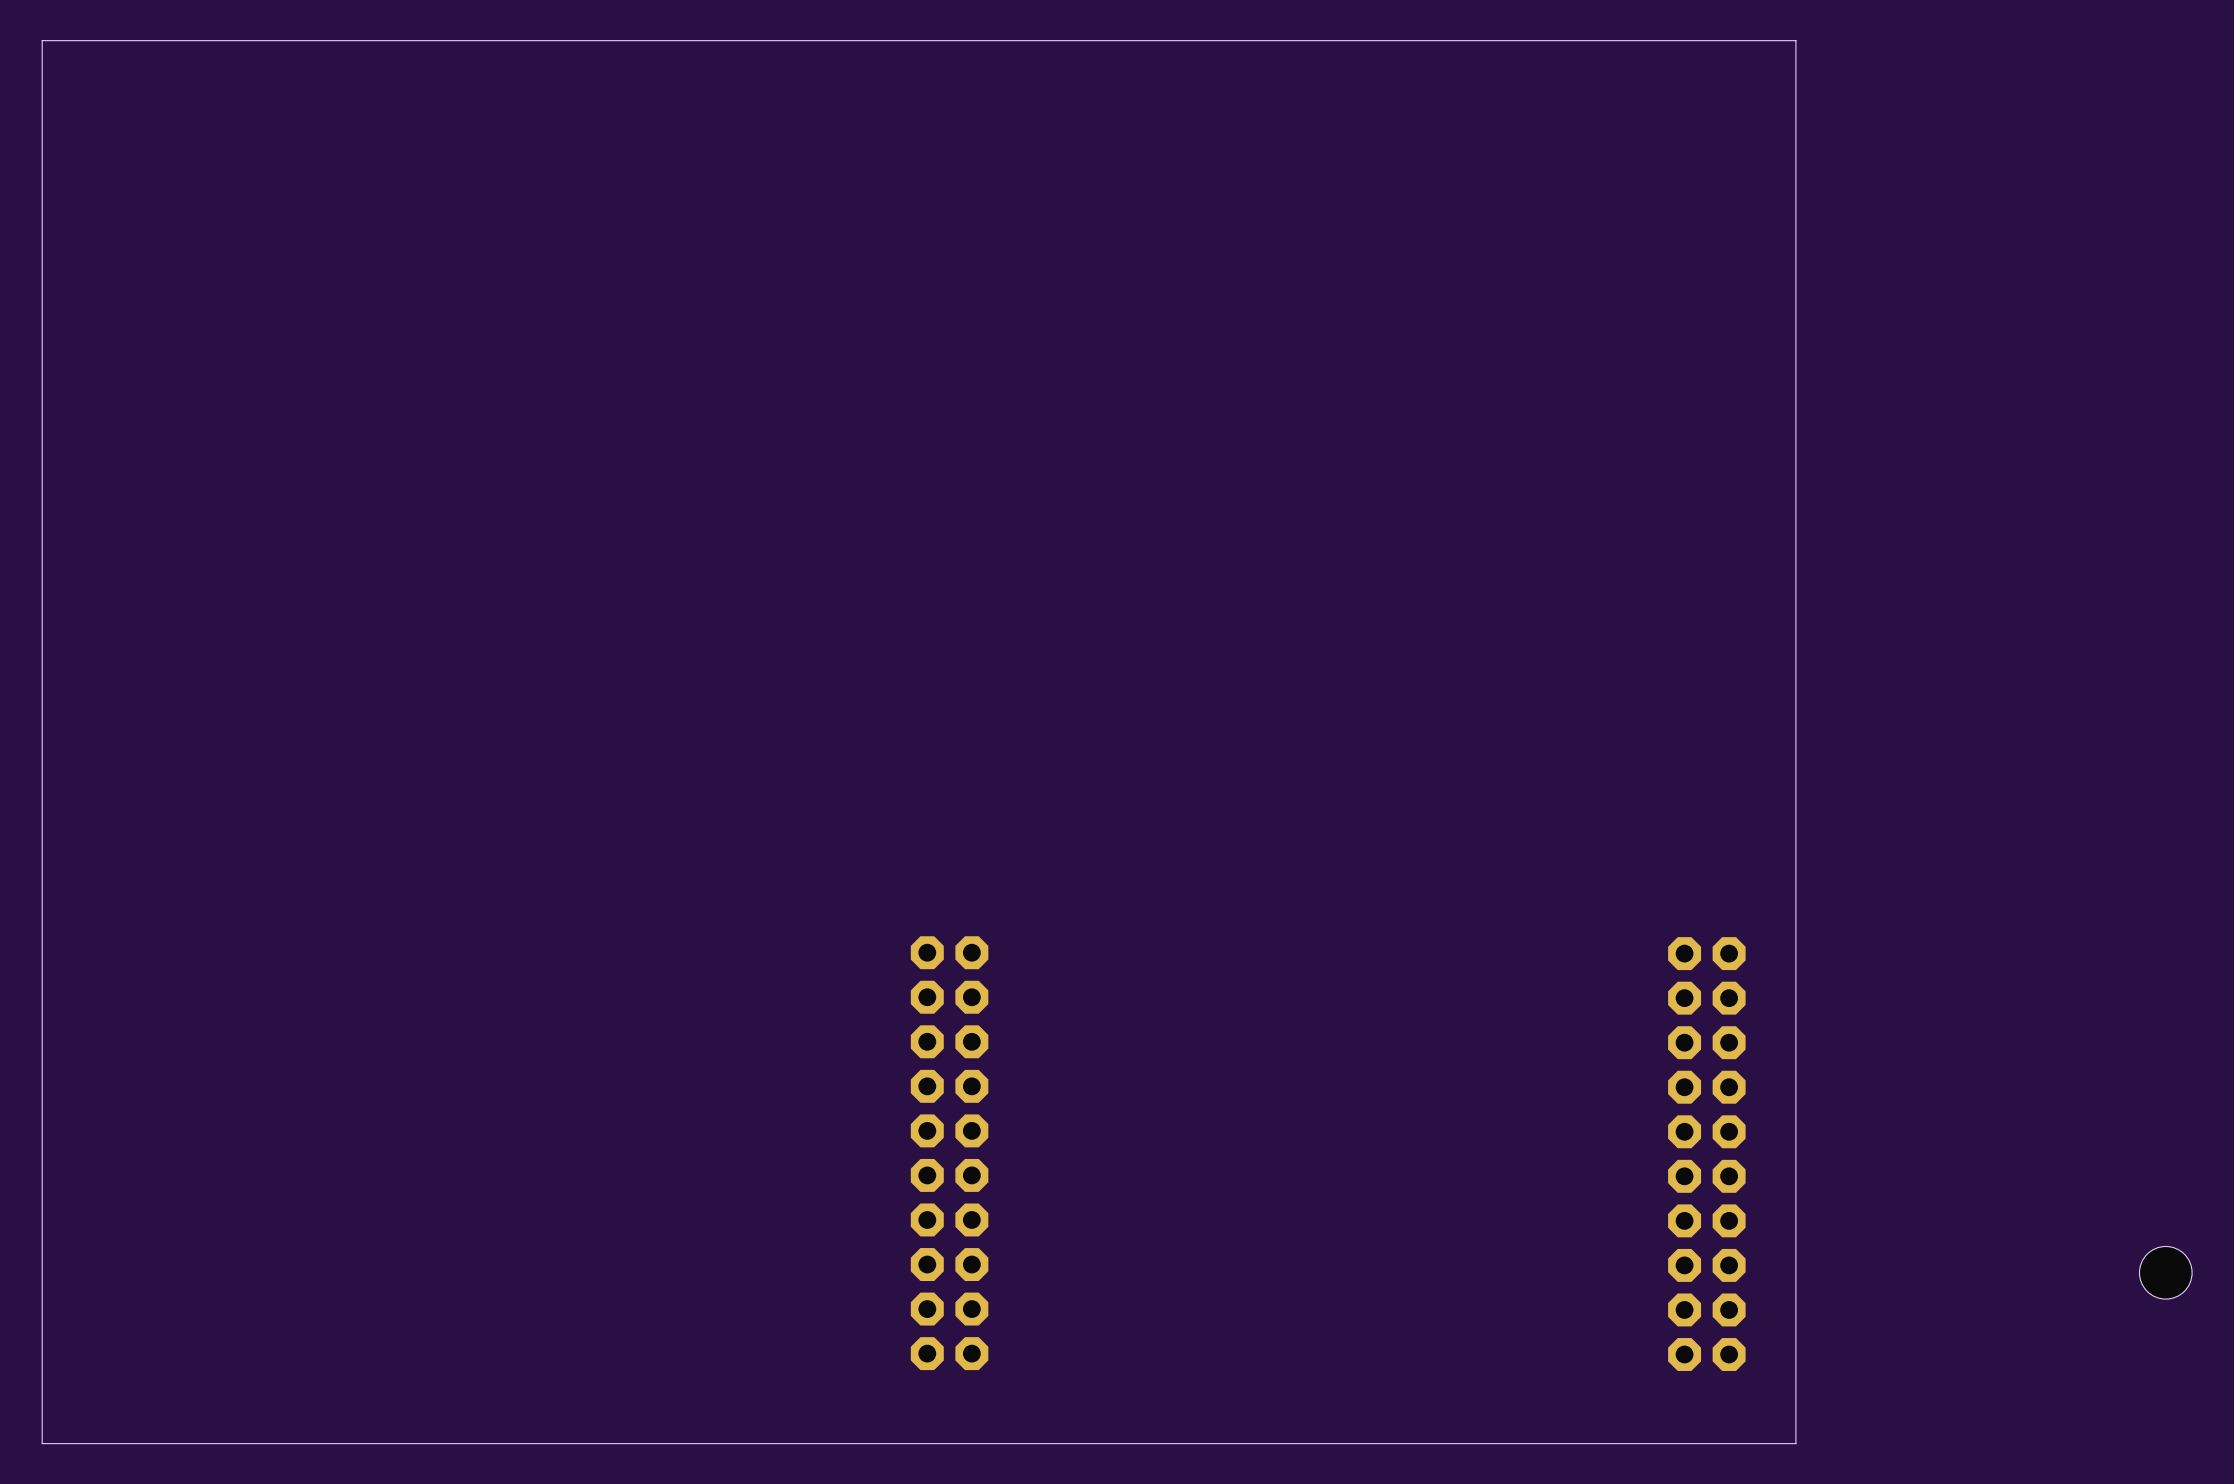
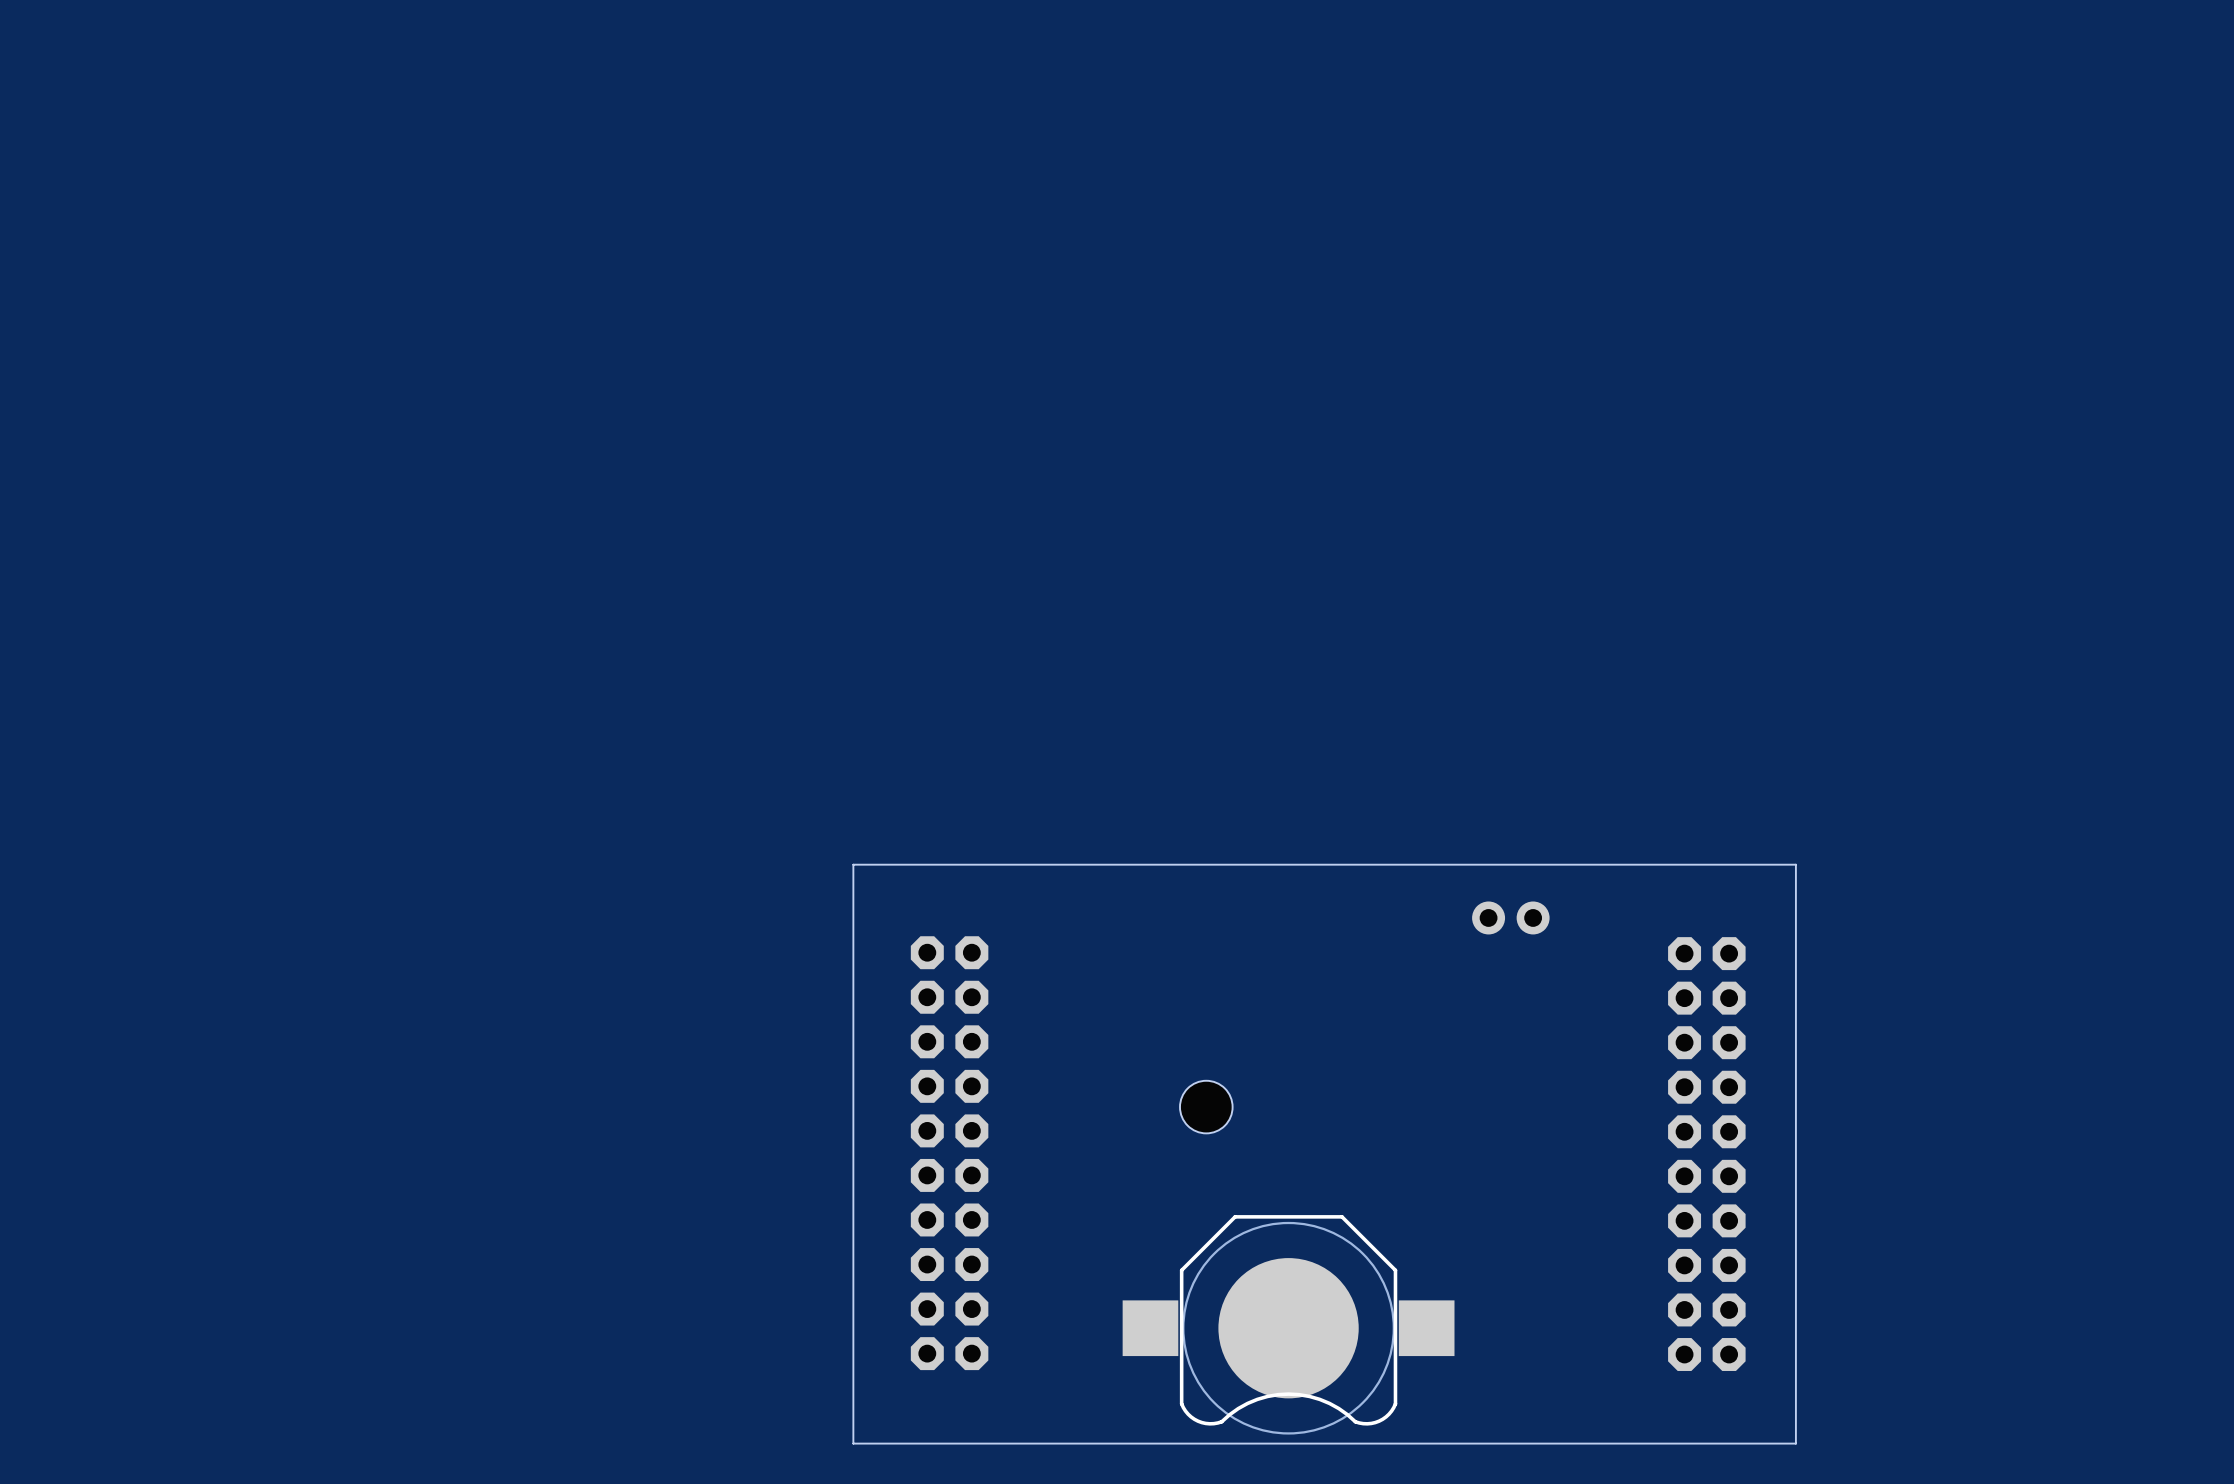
board edge: (1795, 864) (1795, 40) (42, 40) (42, 1443) (853, 1443) -> (1795, 864) (853, 864) (853, 1443)
part: none -> (1510, 917)
part: none -> (1206, 1107)
part: (2165, 1272) -> none
part: none -> (1288, 1324)

